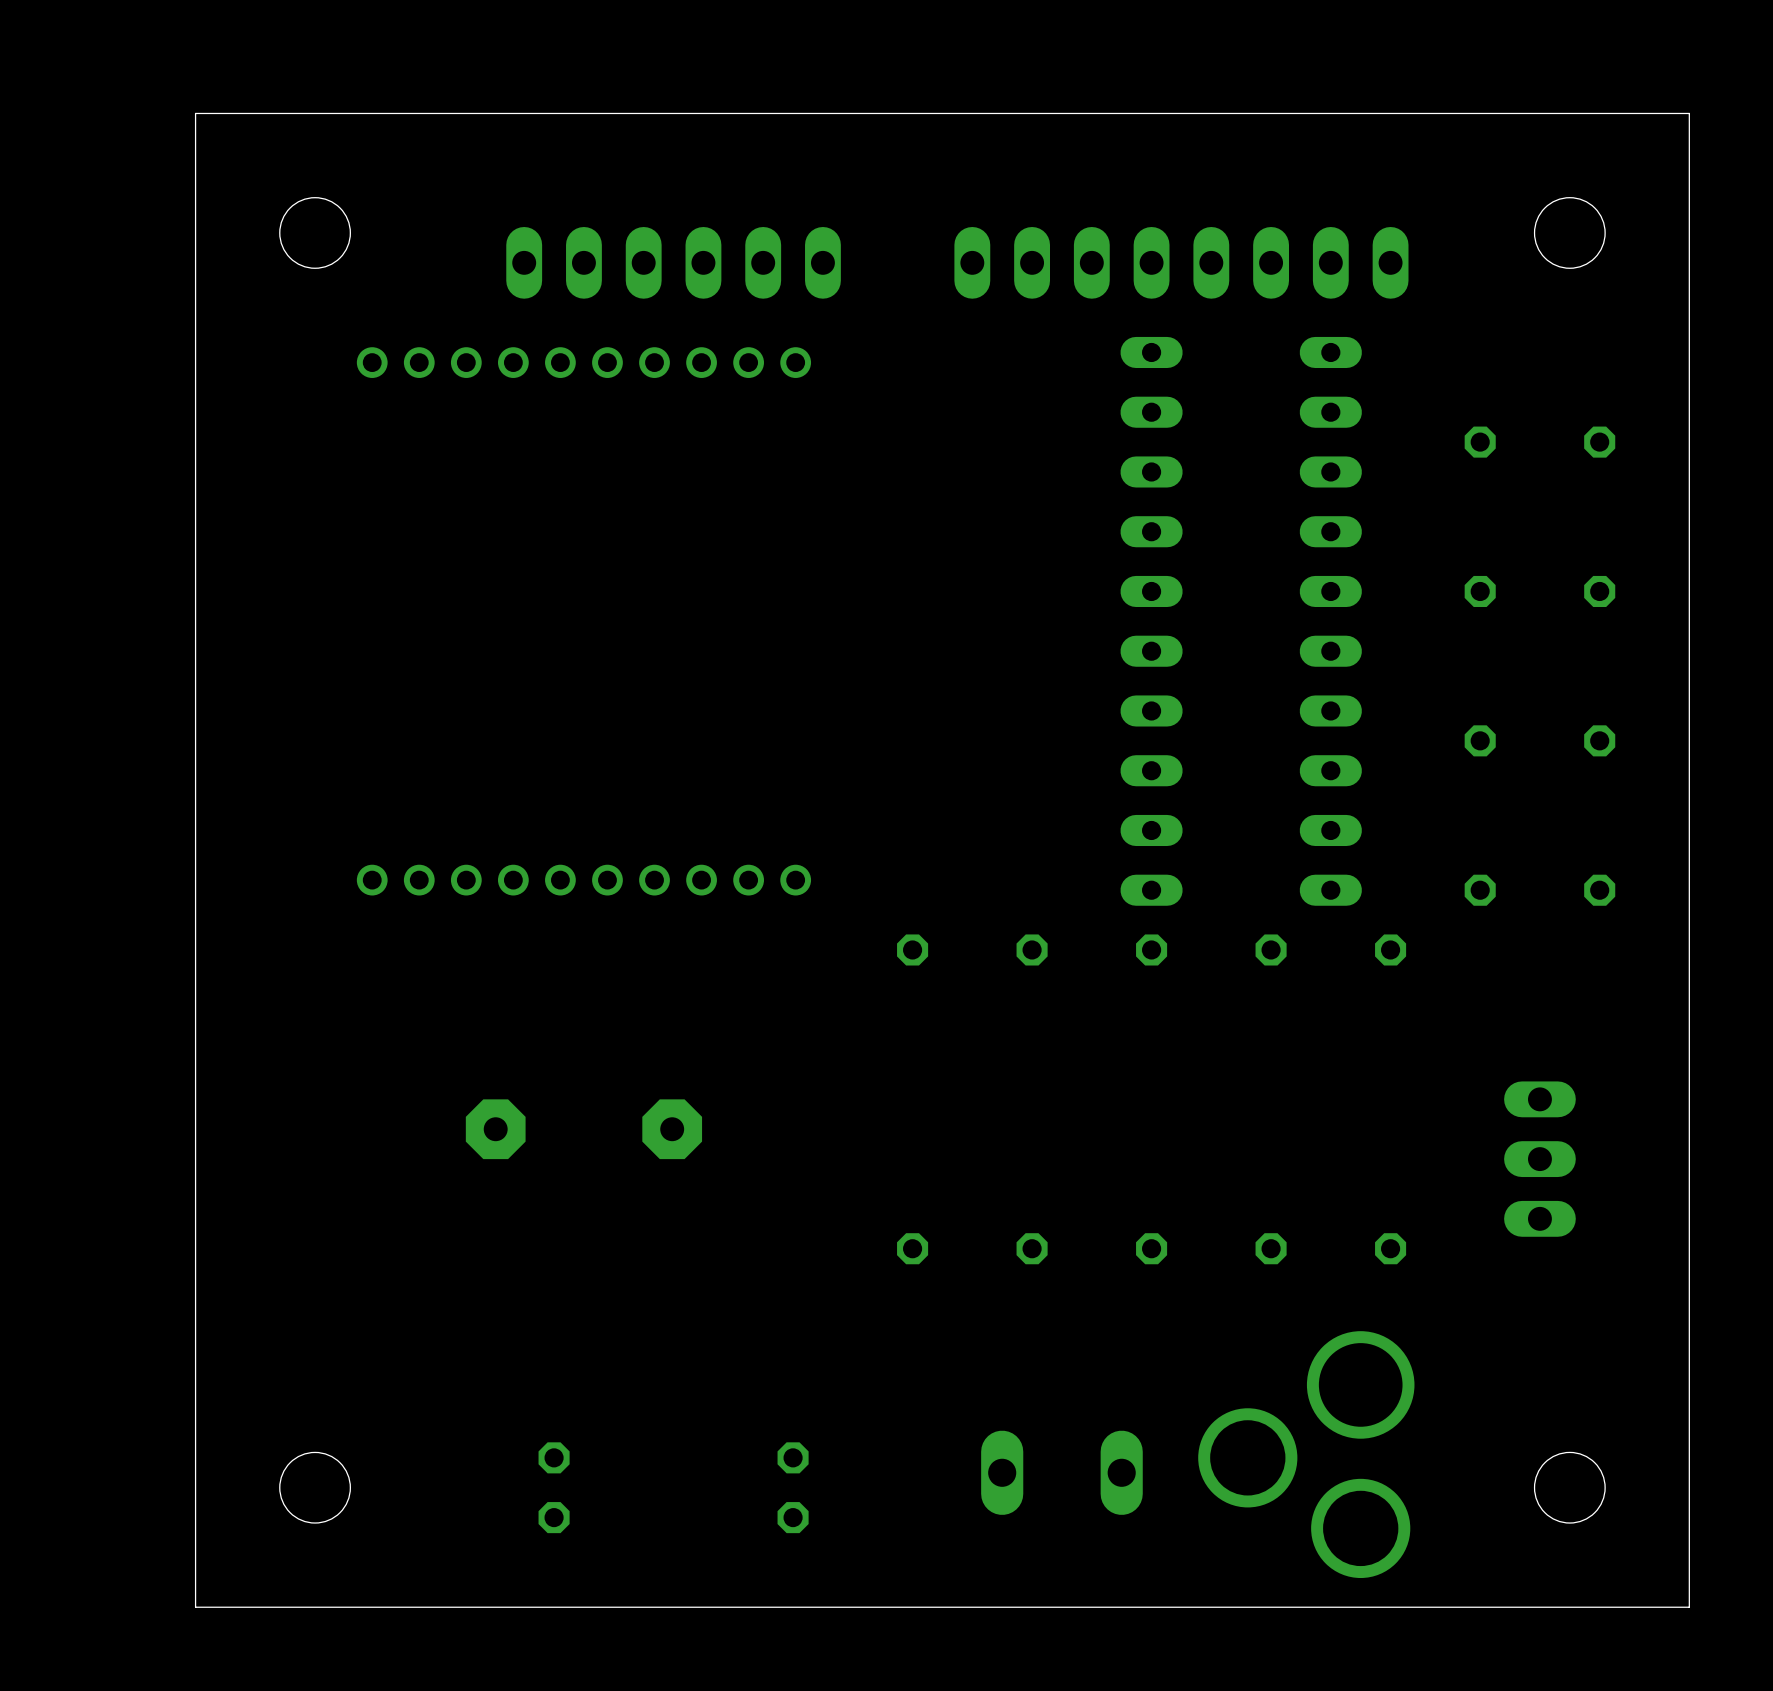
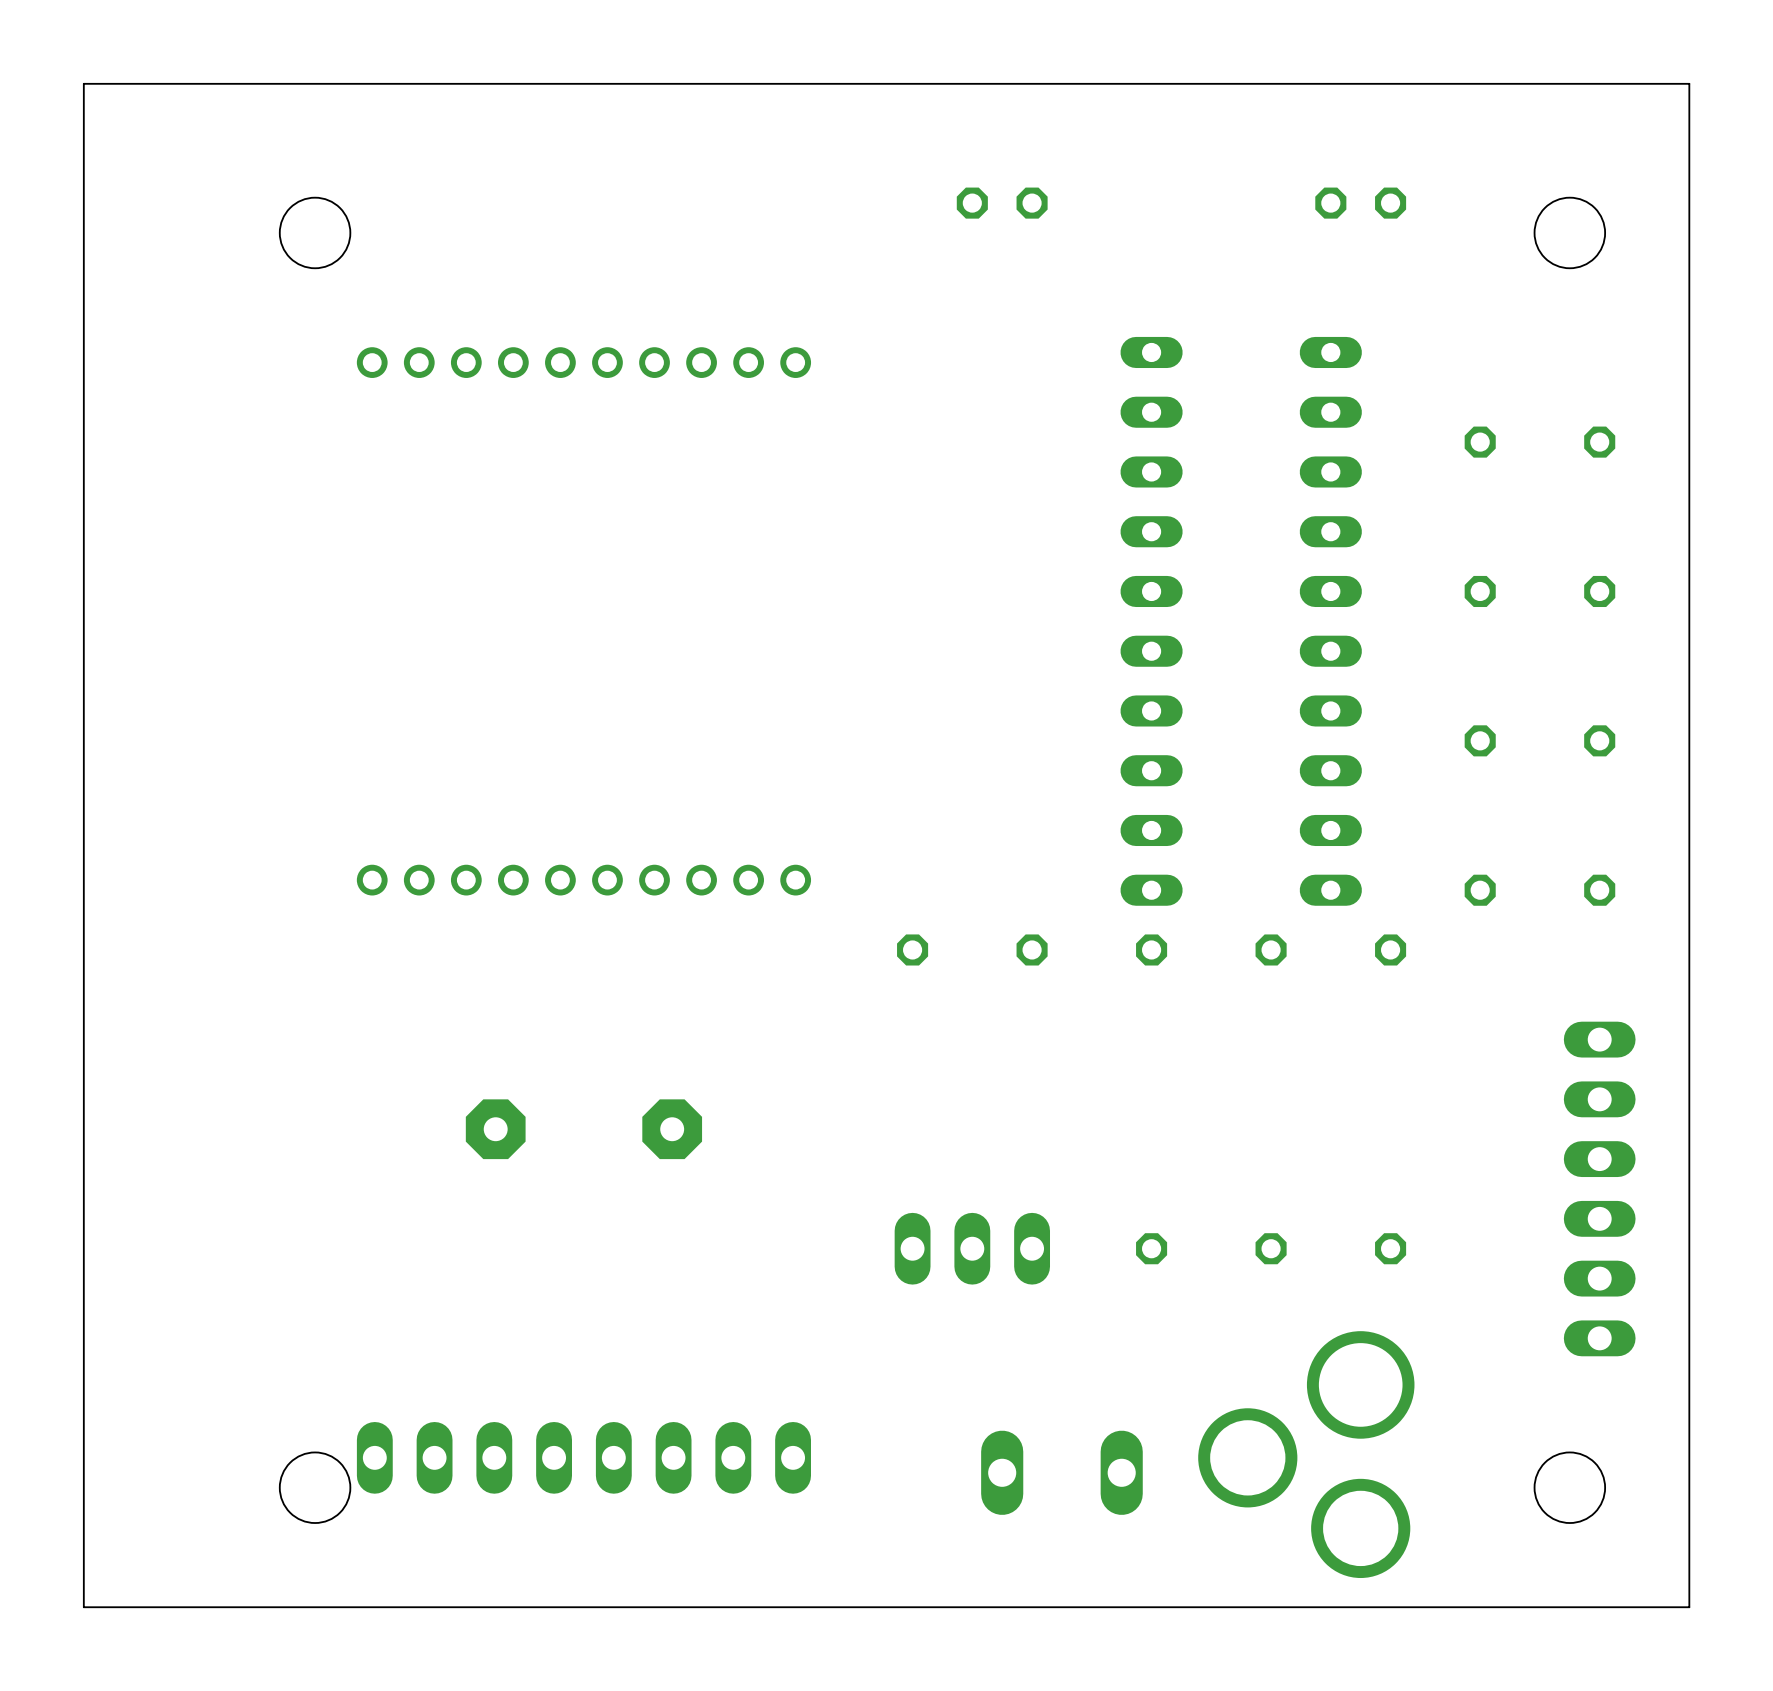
board edge: (1689, 113) (195, 113) (195, 1607) -> (1689, 113) (1689, 83) (83, 83) (83, 1607) (195, 1607)
part: none -> (1002, 203)
part: none -> (1360, 203)
part: (673, 262) -> none
part: (1181, 262) -> none
part rotation: 0° (1539, 1159) -> 90° clockwise (972, 1248)
part position: (1539, 1159) -> (972, 1248)
part: none -> (1599, 1188)
part: none -> (583, 1457)
part: (554, 1487) -> none
part: (793, 1487) -> none

